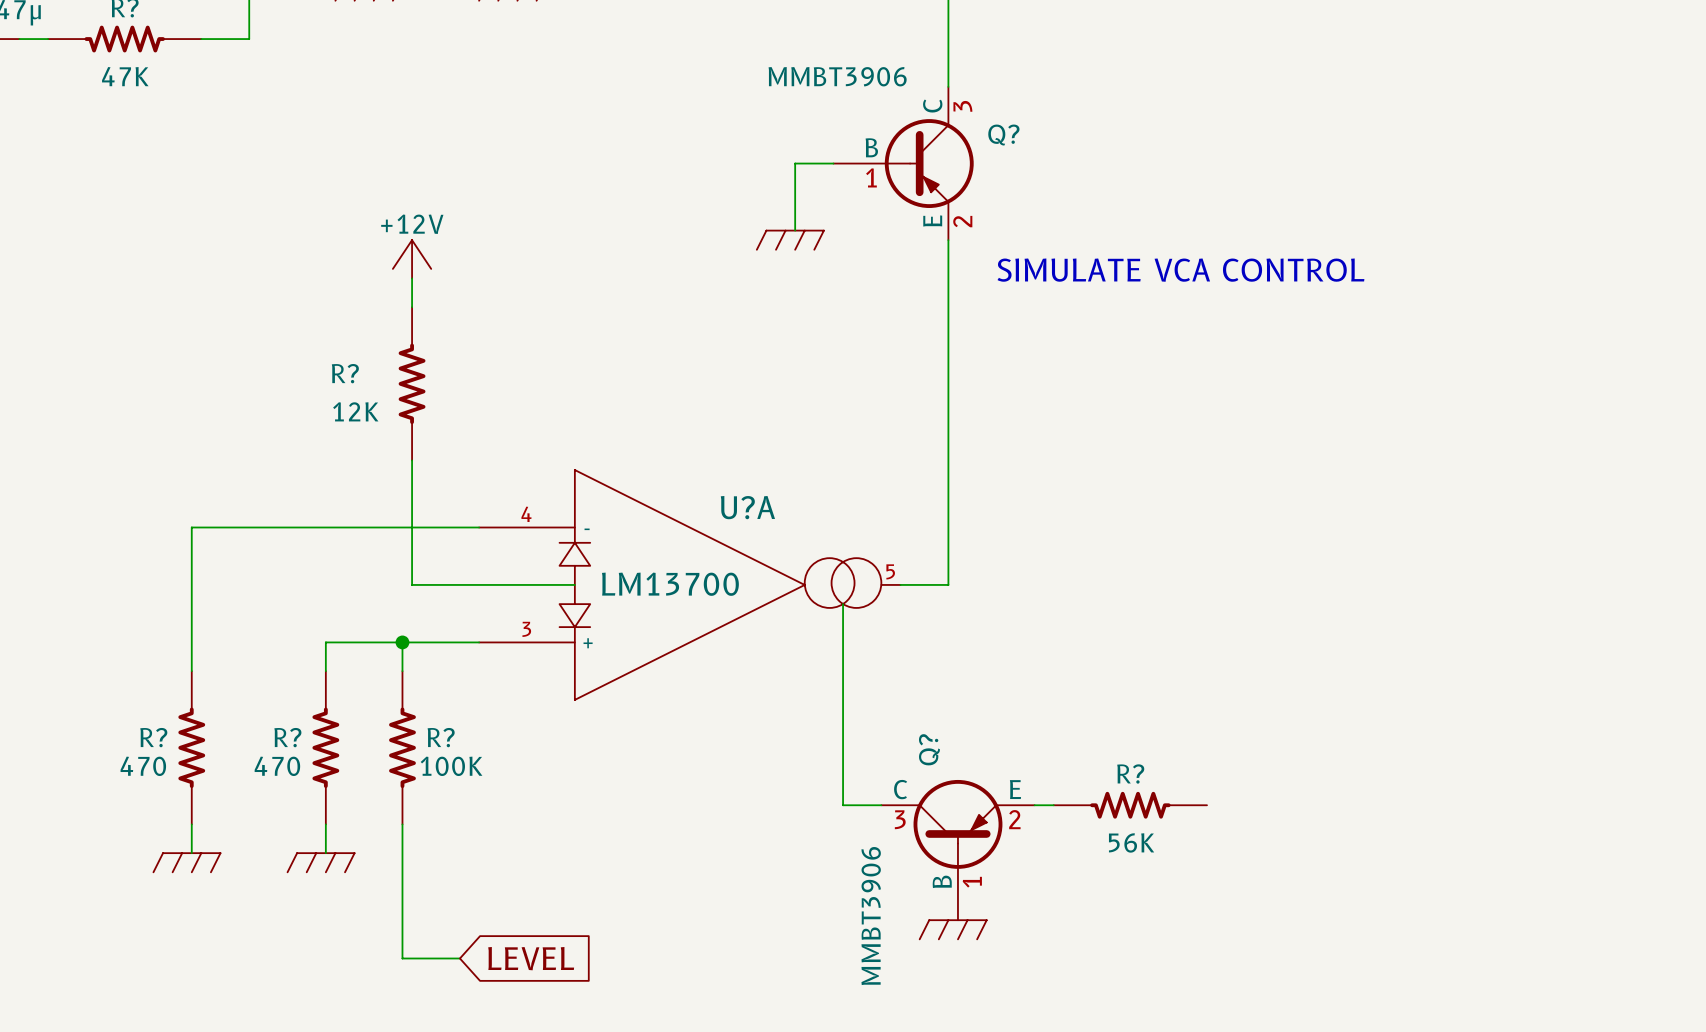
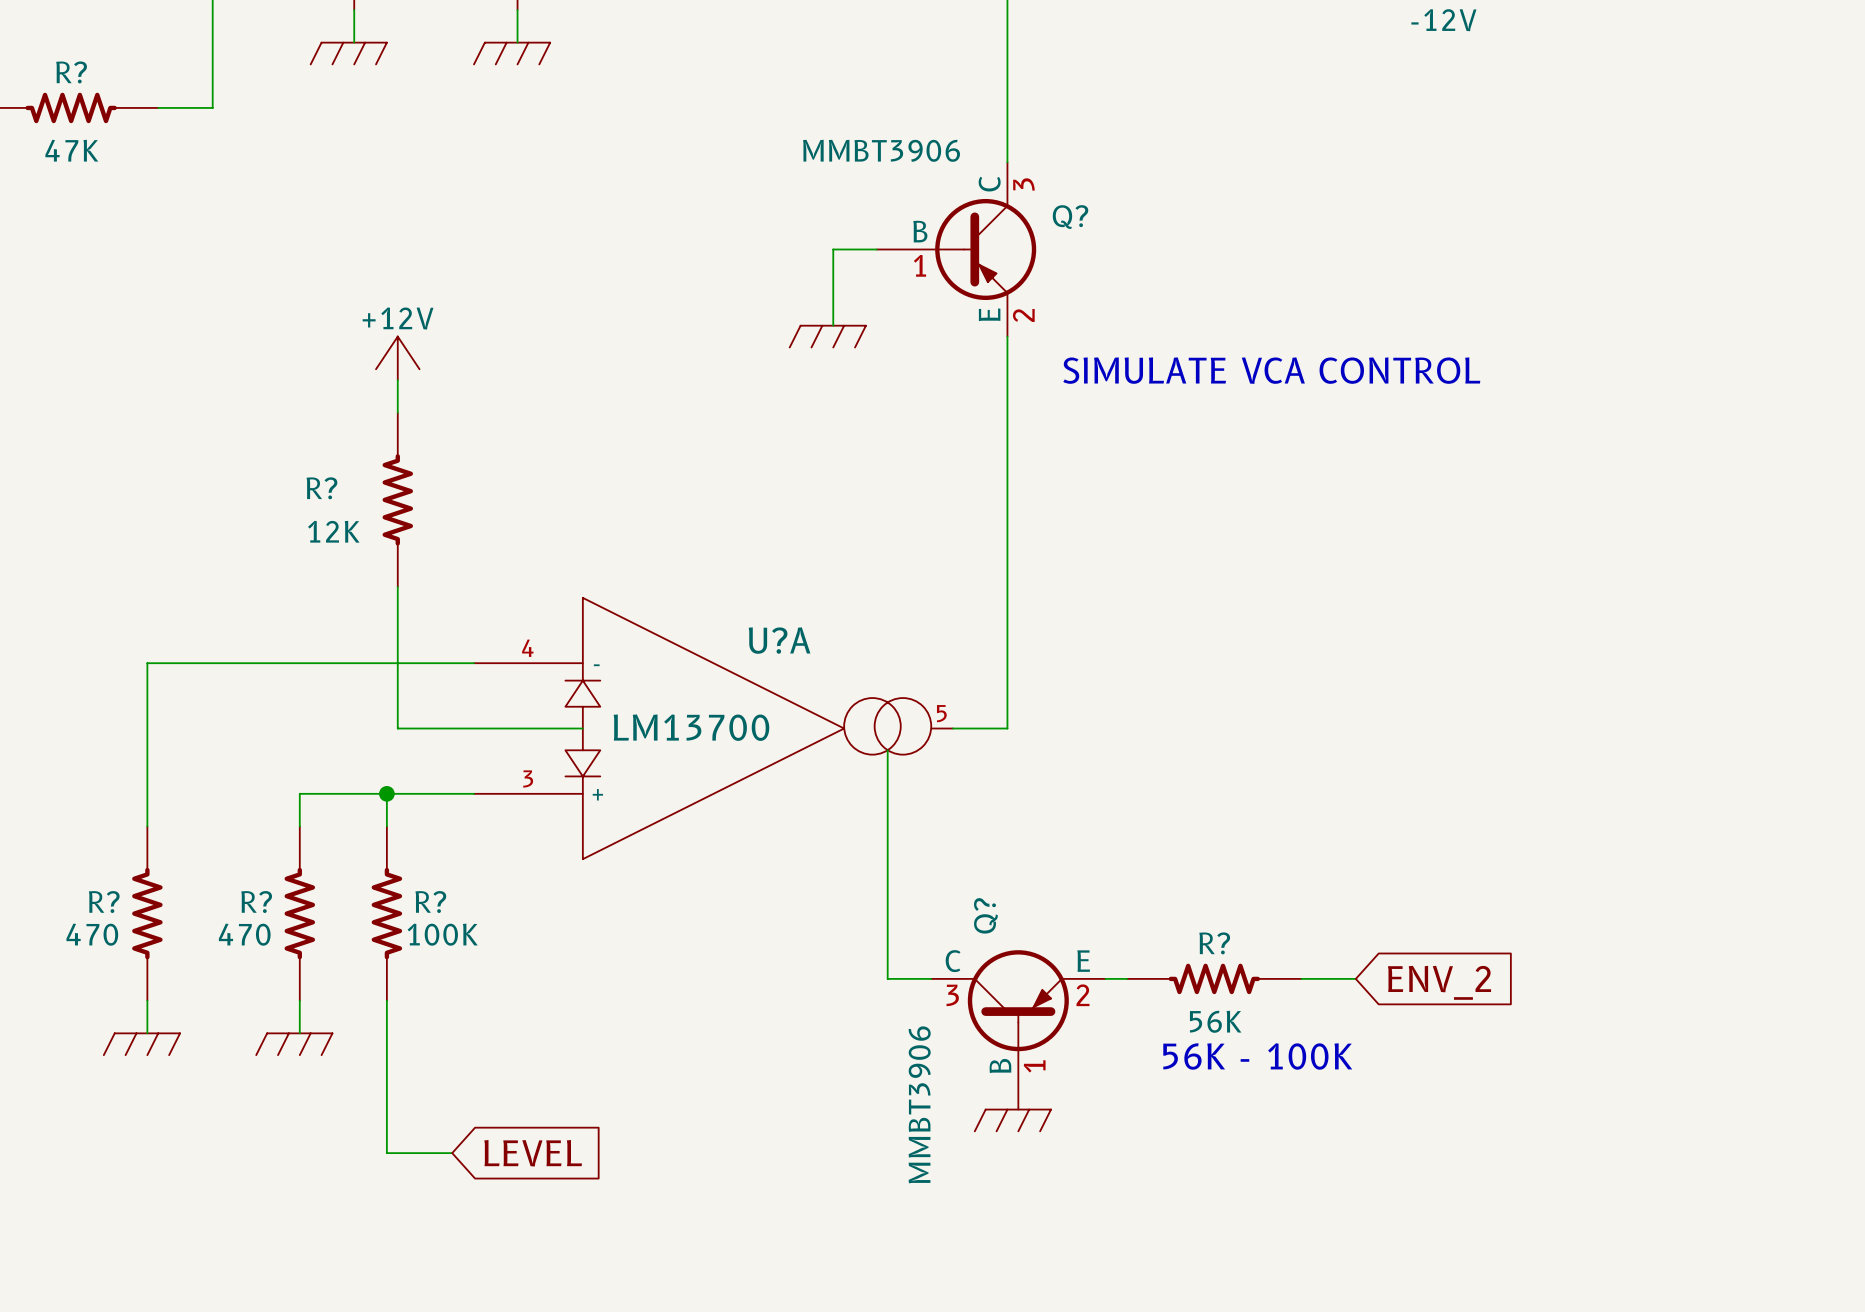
wire: none -> (1301, 978) (1355, 978)
global label: none -> ENV_2 (1439, 982)
text: none -> 56K - 100K (1257, 1056)

